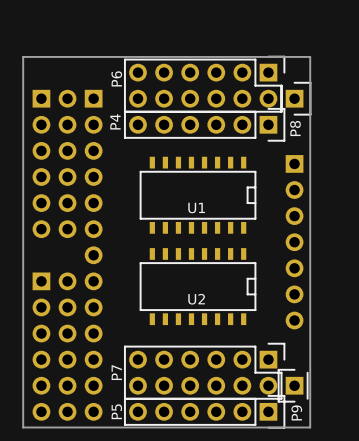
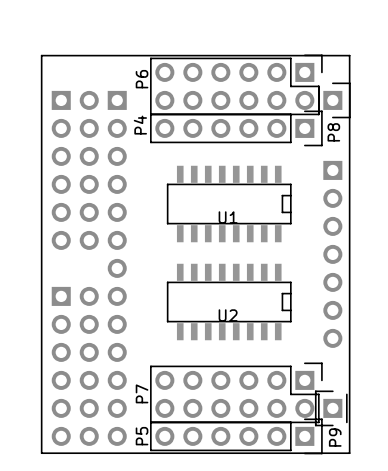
U1 footprint: [139, 156, 257, 234] -> [166, 165, 292, 243]
U2 footprint: [139, 248, 257, 326] -> [166, 263, 292, 341]

